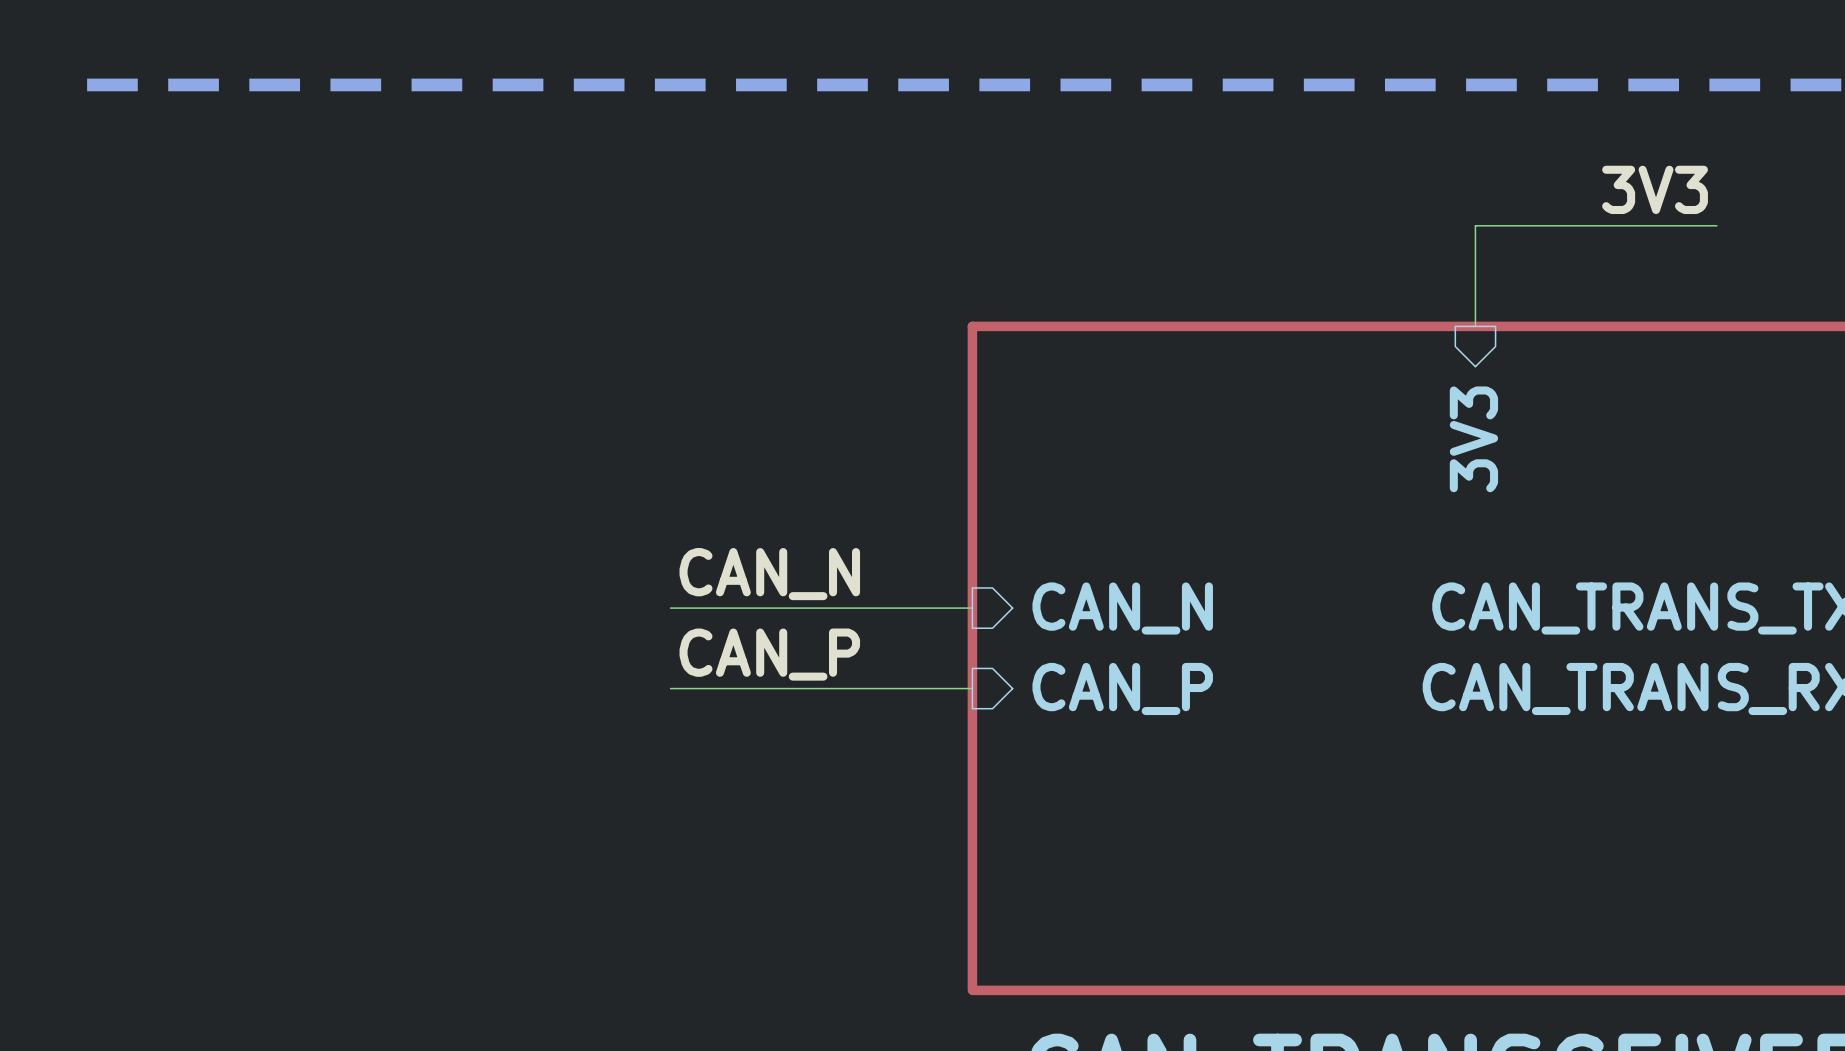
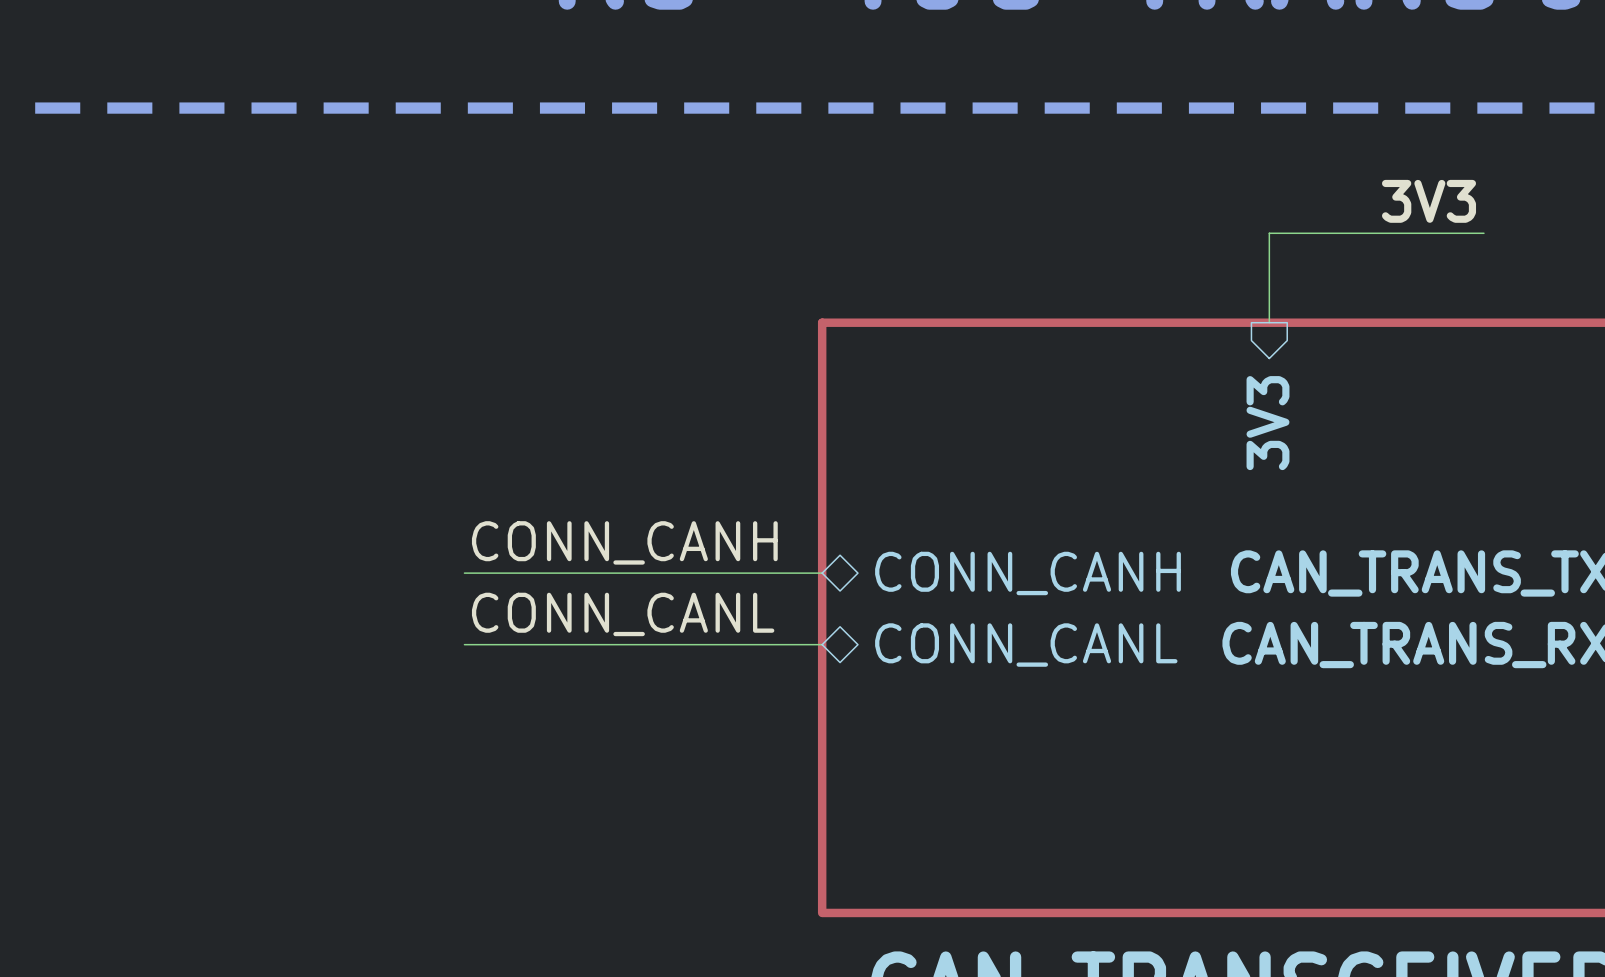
label: none -> CONN_CANH (624, 542)
label: CAN_N (769, 574) -> none
wire: none -> (464, 573) (553, 573)
sheet pin shape: input (1122, 608) -> bidirectional (1028, 573)
sheet pin: CAN_N (1122, 608) -> CONN_CANH (1028, 573)
label: none -> CONN_CANL (623, 614)
label: CAN_P (769, 654) -> none
wire: none -> (464, 644) (553, 644)
sheet pin shape: input (1122, 688) -> bidirectional (1026, 645)
sheet pin: CAN_P (1122, 688) -> CONN_CANL (1026, 645)

